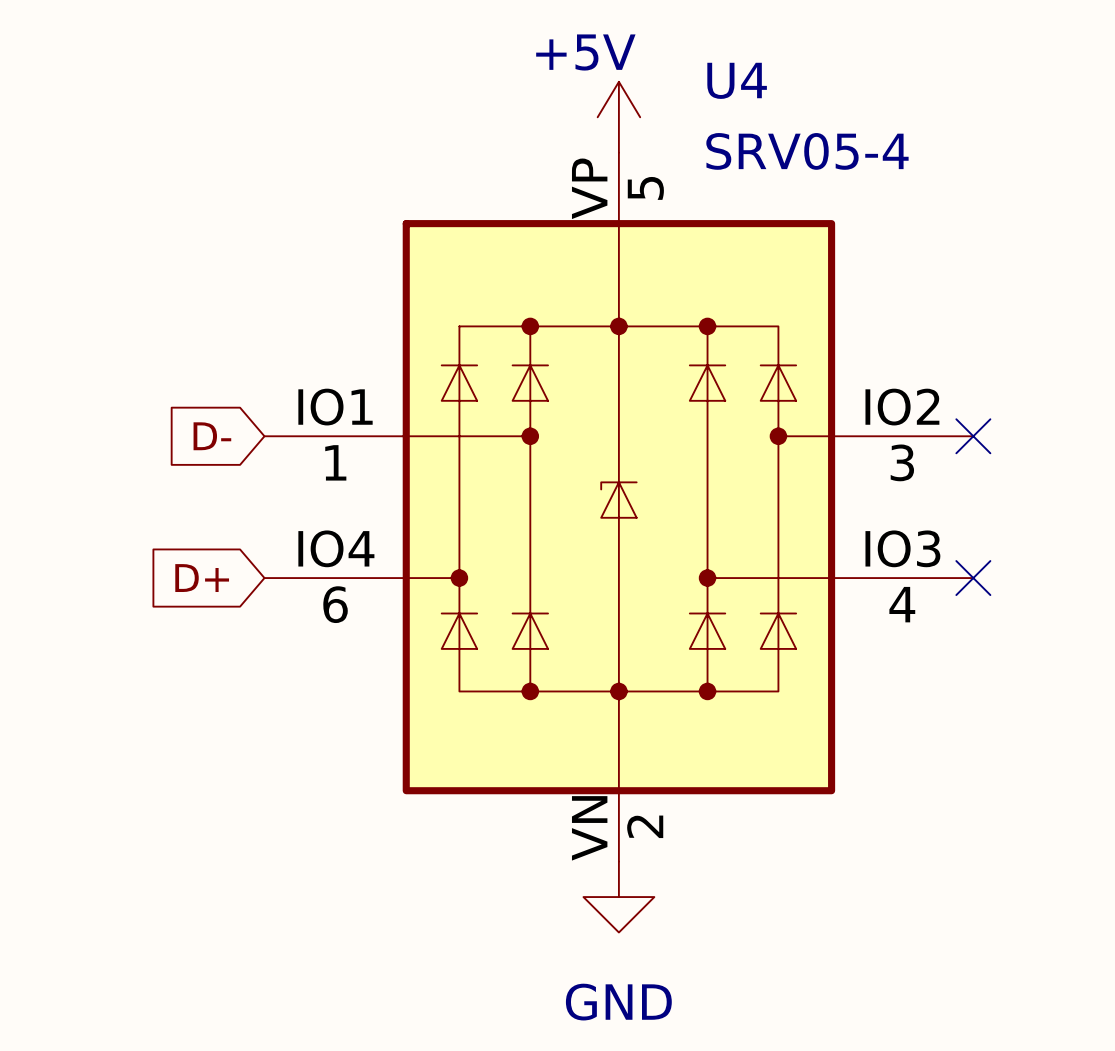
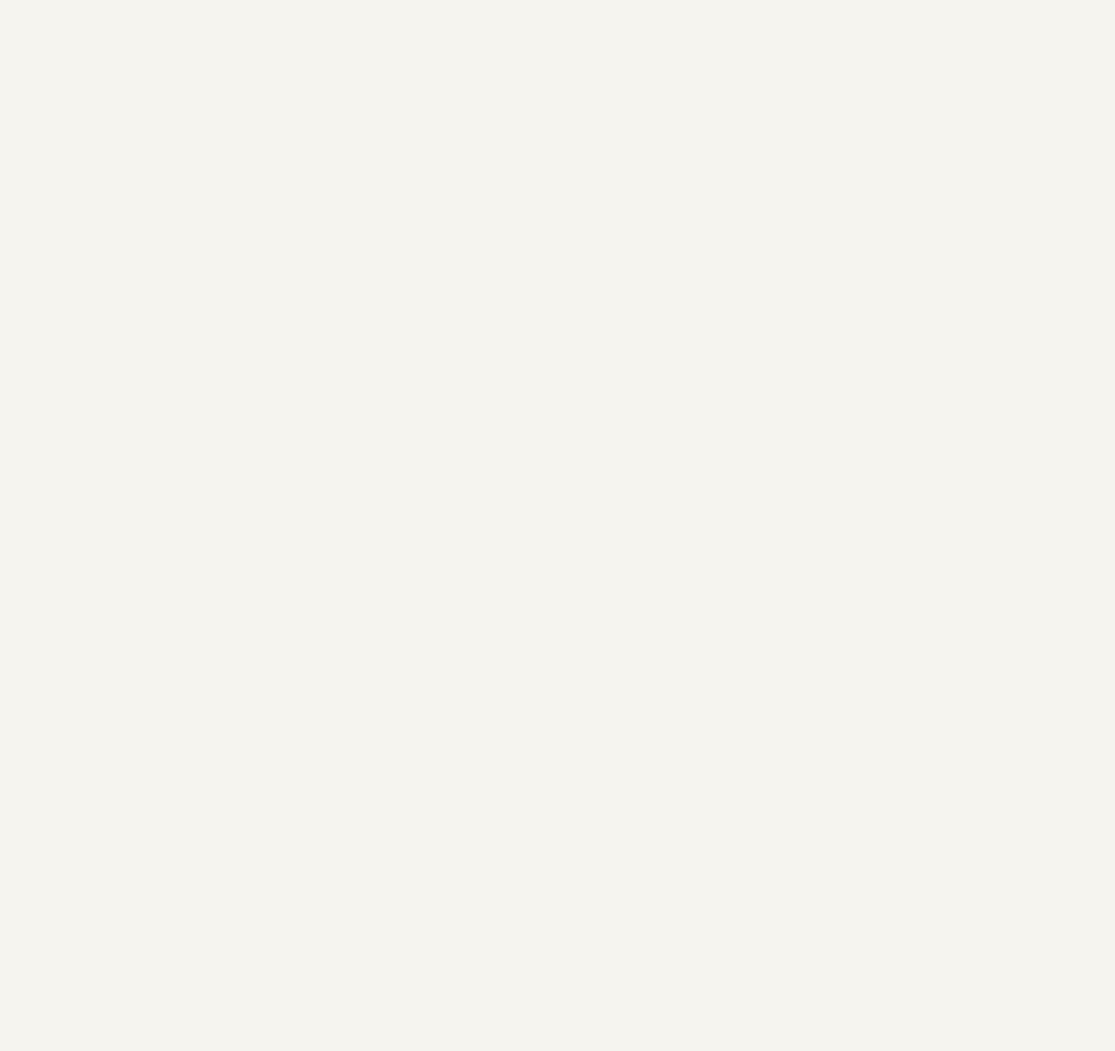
power symbol: +5V (618, 117) -> none
global label: D- (212, 436) -> none
no-connect mark: (973, 436) -> none
U4: SRV05-4 (618, 507) -> none
global label: D+ (202, 578) -> none
no-connect mark: (973, 578) -> none
power symbol: GND (618, 897) -> none

